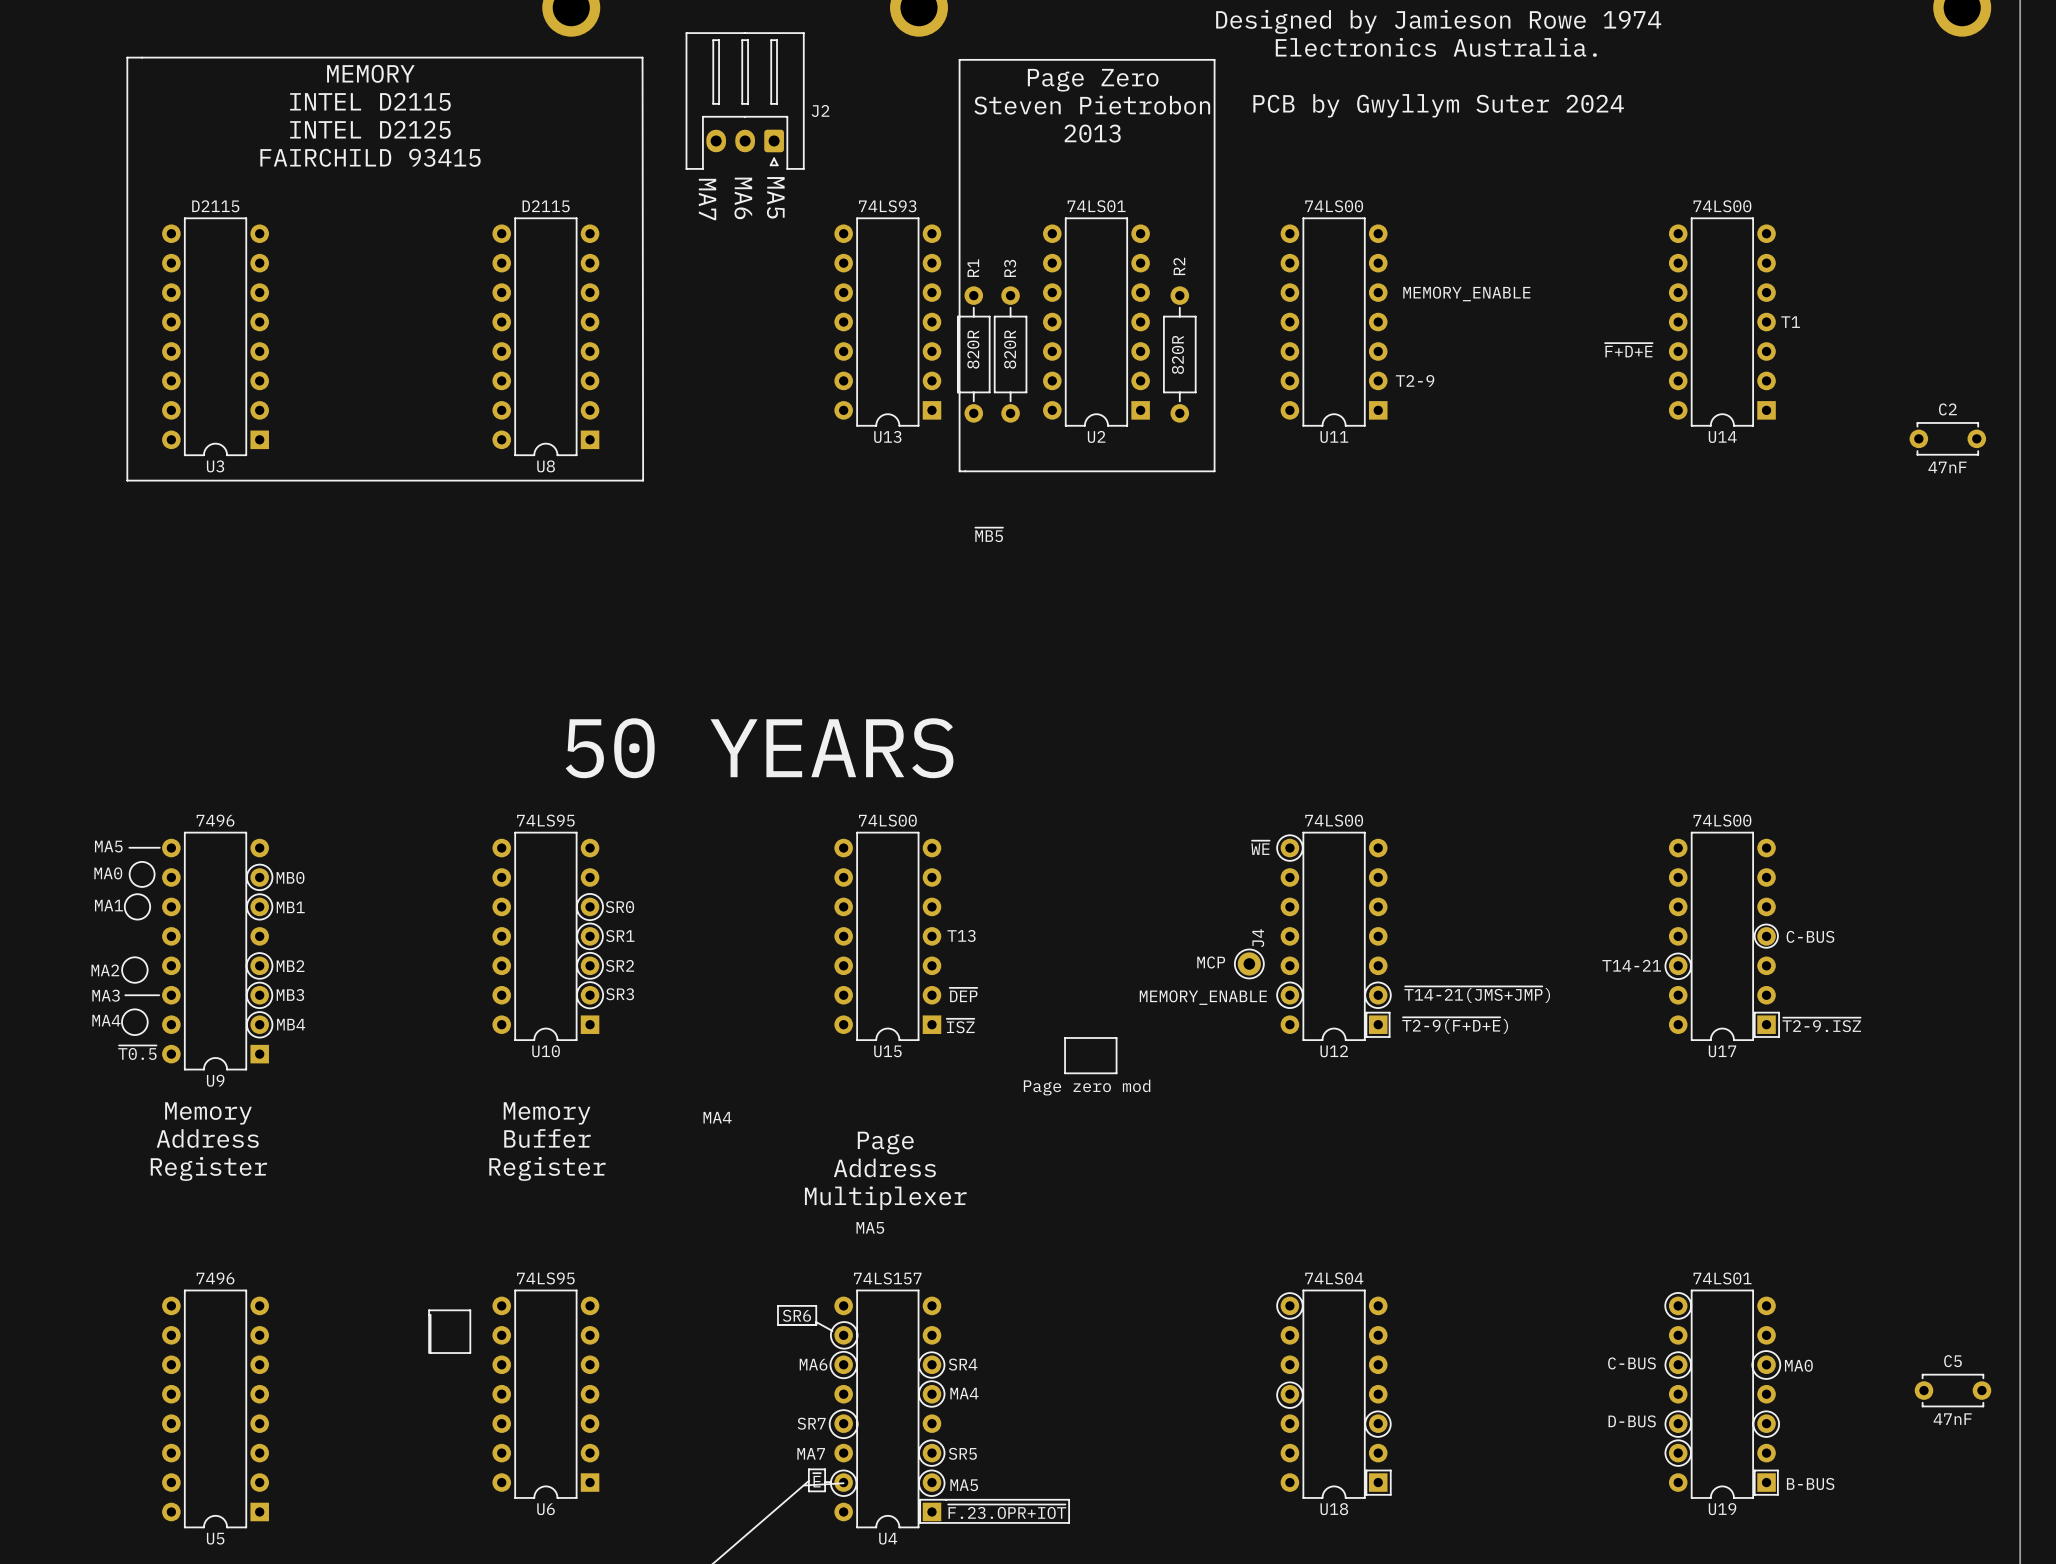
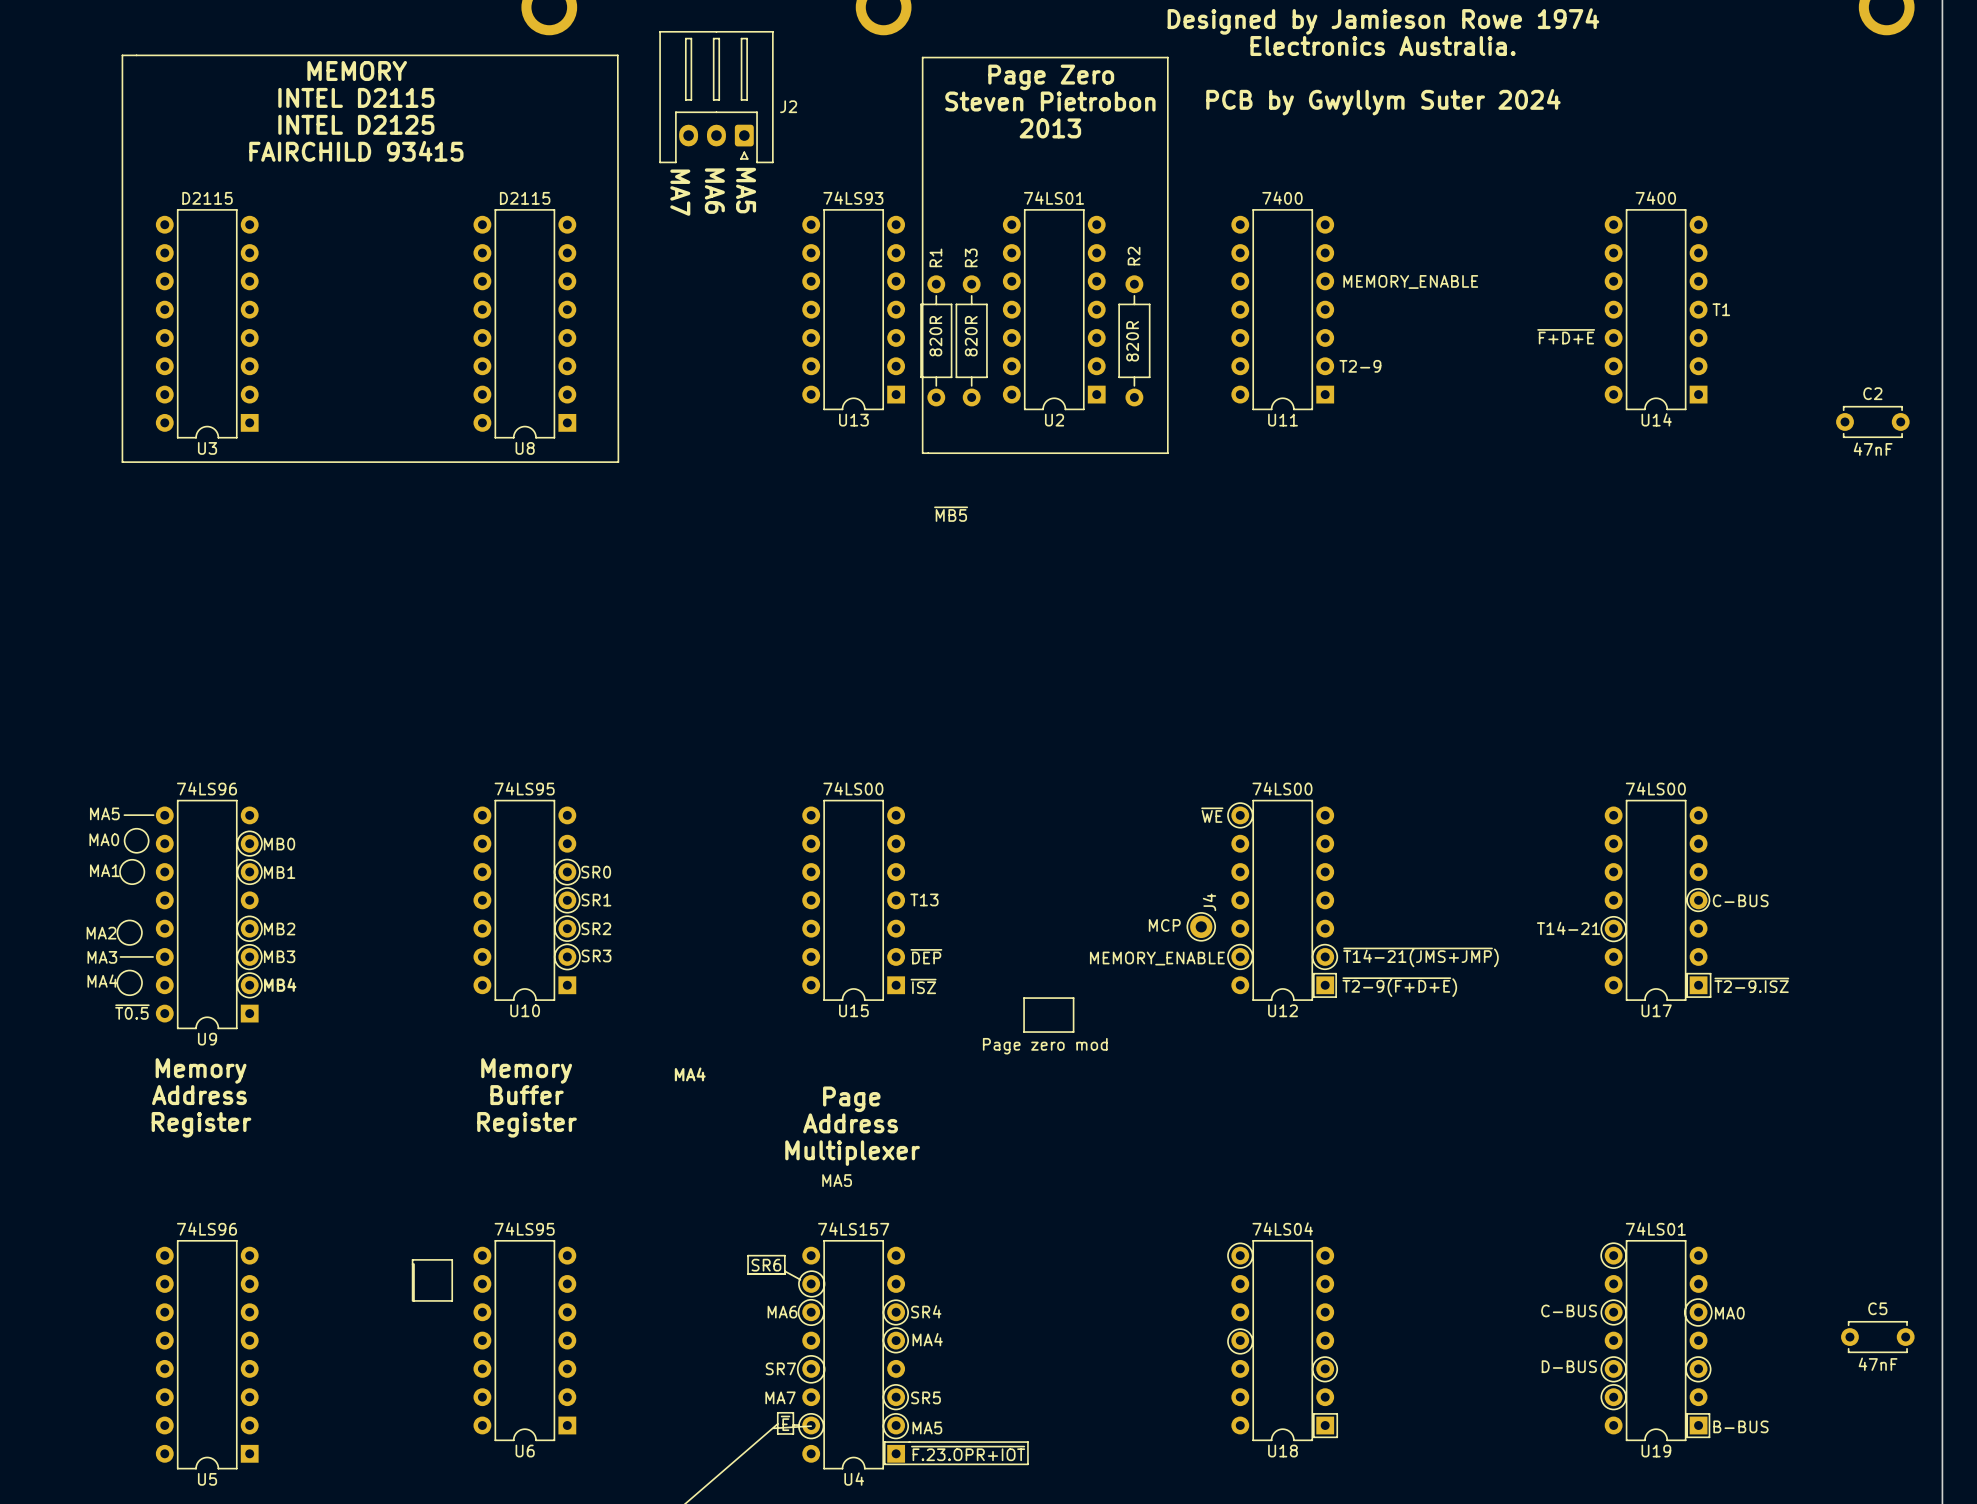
U11 value: 74LS00 (1334, 206) -> 7400 (1282, 198)
U14 value: 74LS00 (1722, 206) -> 7400 (1655, 198)
text: 50 YEARS (759, 748) -> none
U9 value: 7496 (215, 820) -> 74LS96 (206, 788)
U5 value: 7496 (215, 1278) -> 74LS96 (206, 1228)

